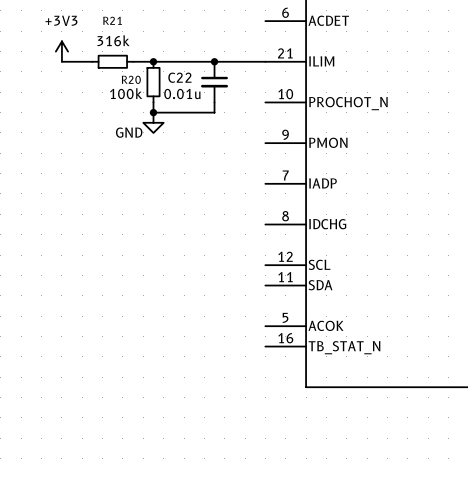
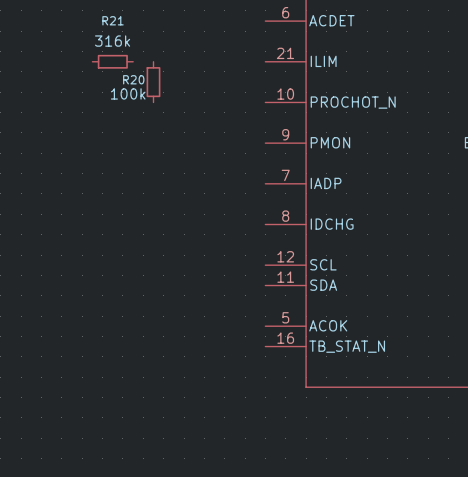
power symbol: +3V3 (61, 51) -> none
wire: (61, 61) (92, 61) -> none
wire: (133, 61) (265, 61) -> none
junction: (153, 61) -> none
junction: (214, 61) -> none
C22: 0.01u (214, 82) -> none
wire: (153, 102) (153, 112) (214, 112) (214, 102) -> none
junction: (153, 112) -> none
power symbol: GND (153, 122) -> none

